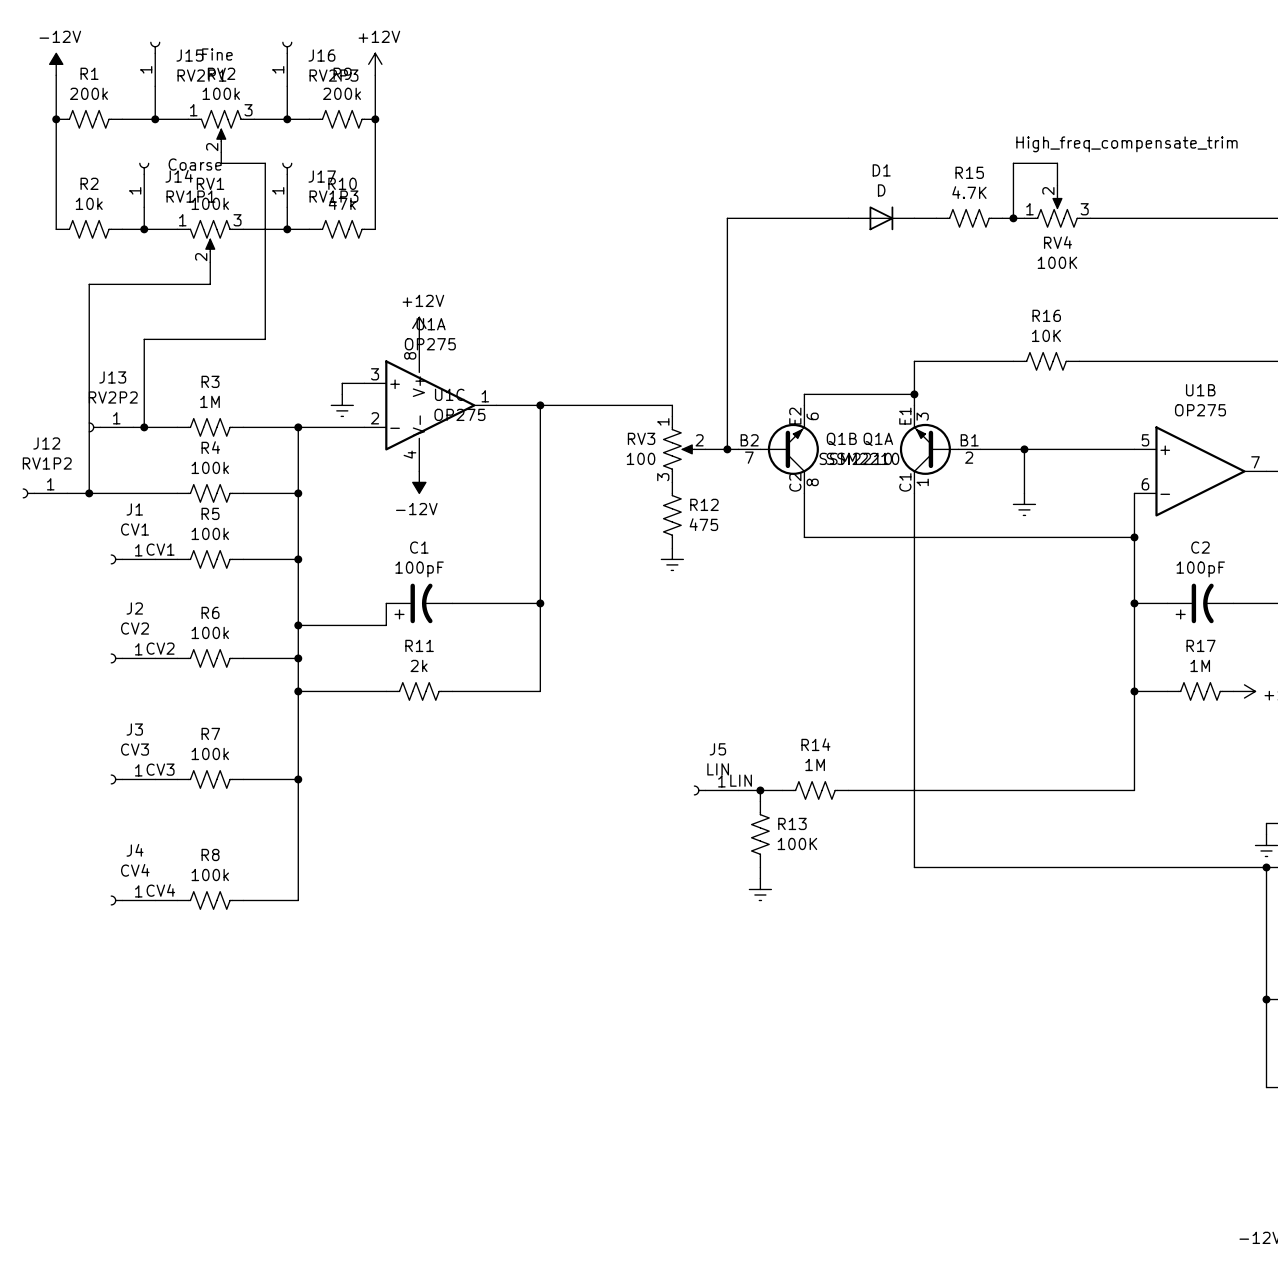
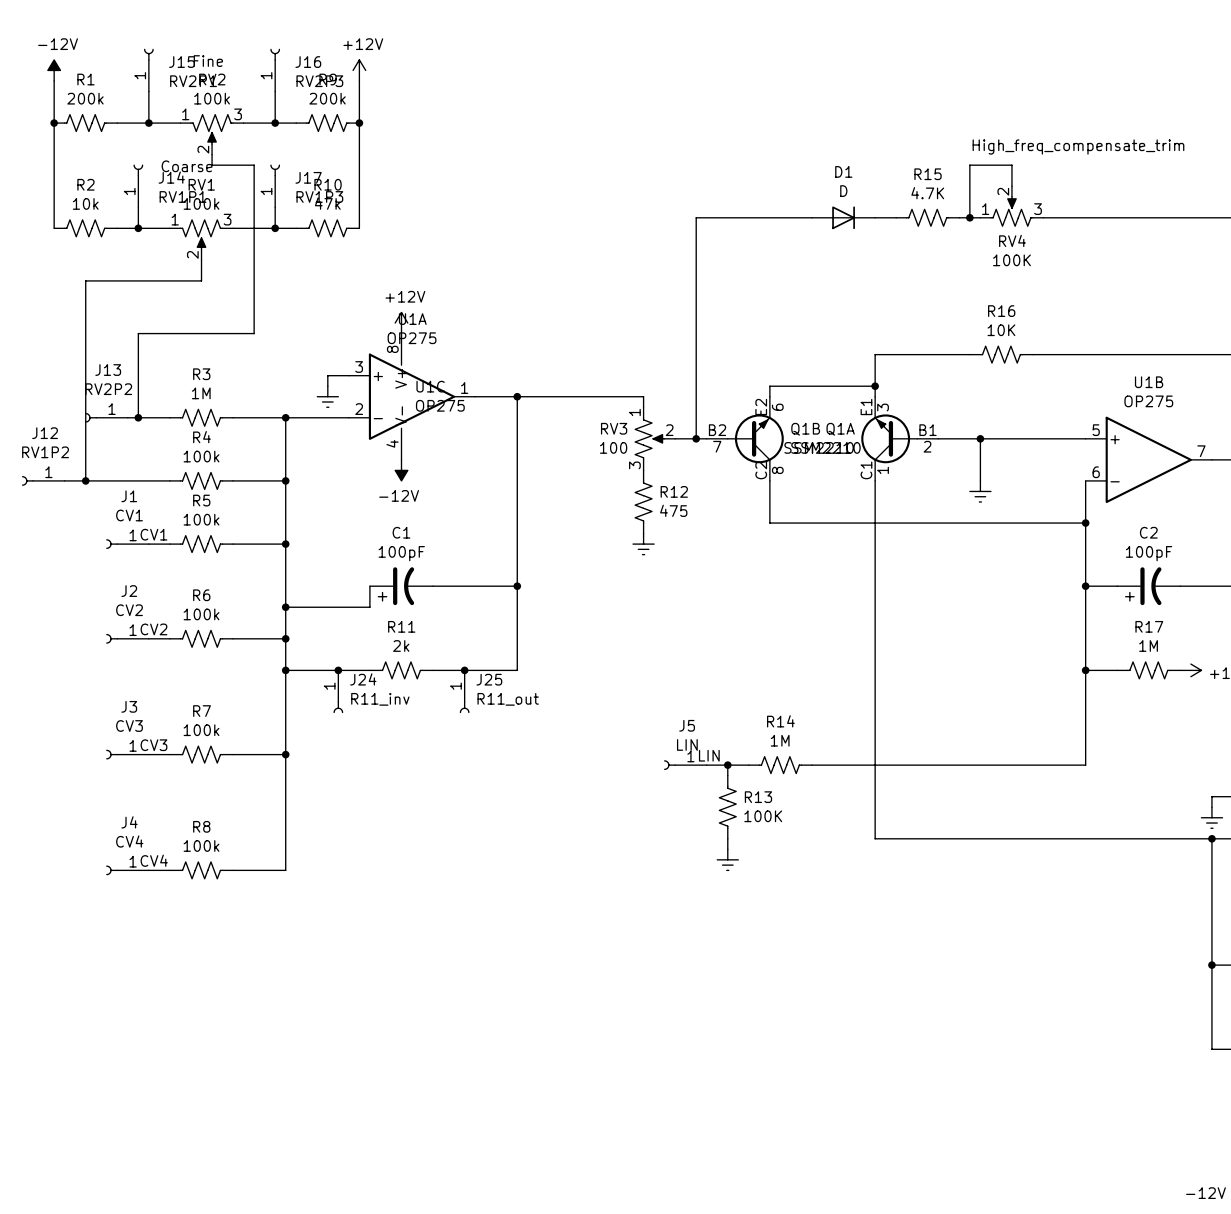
junction: none -> (338, 670)
junction: none -> (464, 670)
J24: none -> R11_inv (338, 691)
J25: none -> R11_out (464, 691)

